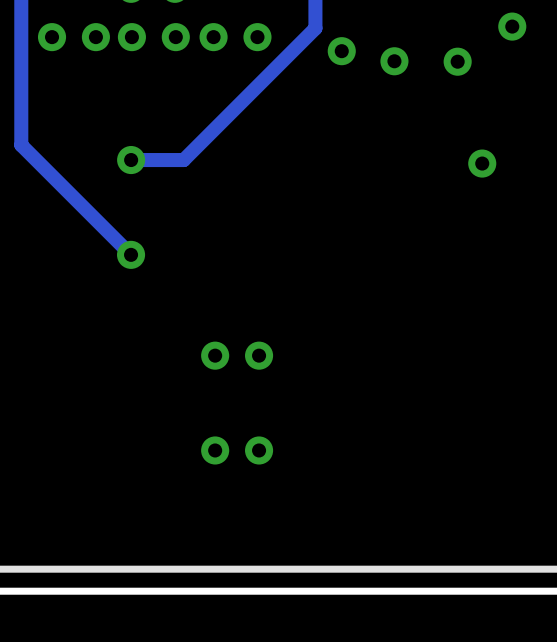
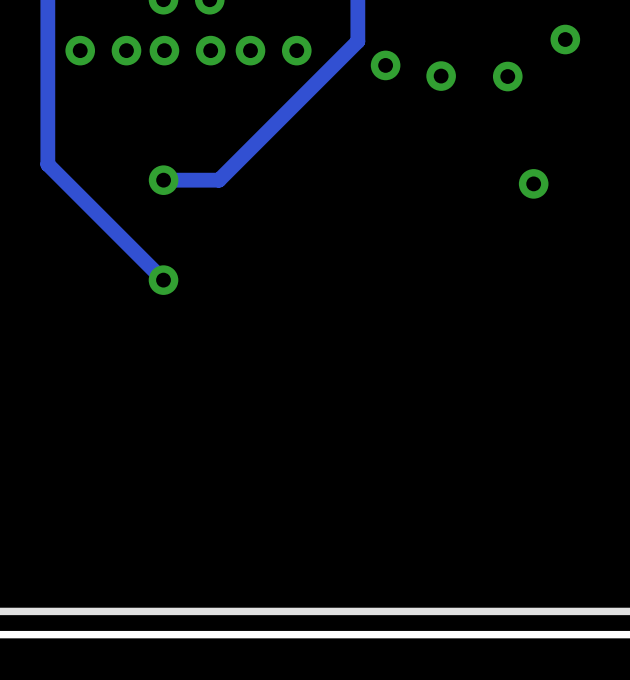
via: (215, 355) -> none
via: (259, 355) -> none
via: (215, 450) -> none
via: (259, 450) -> none

